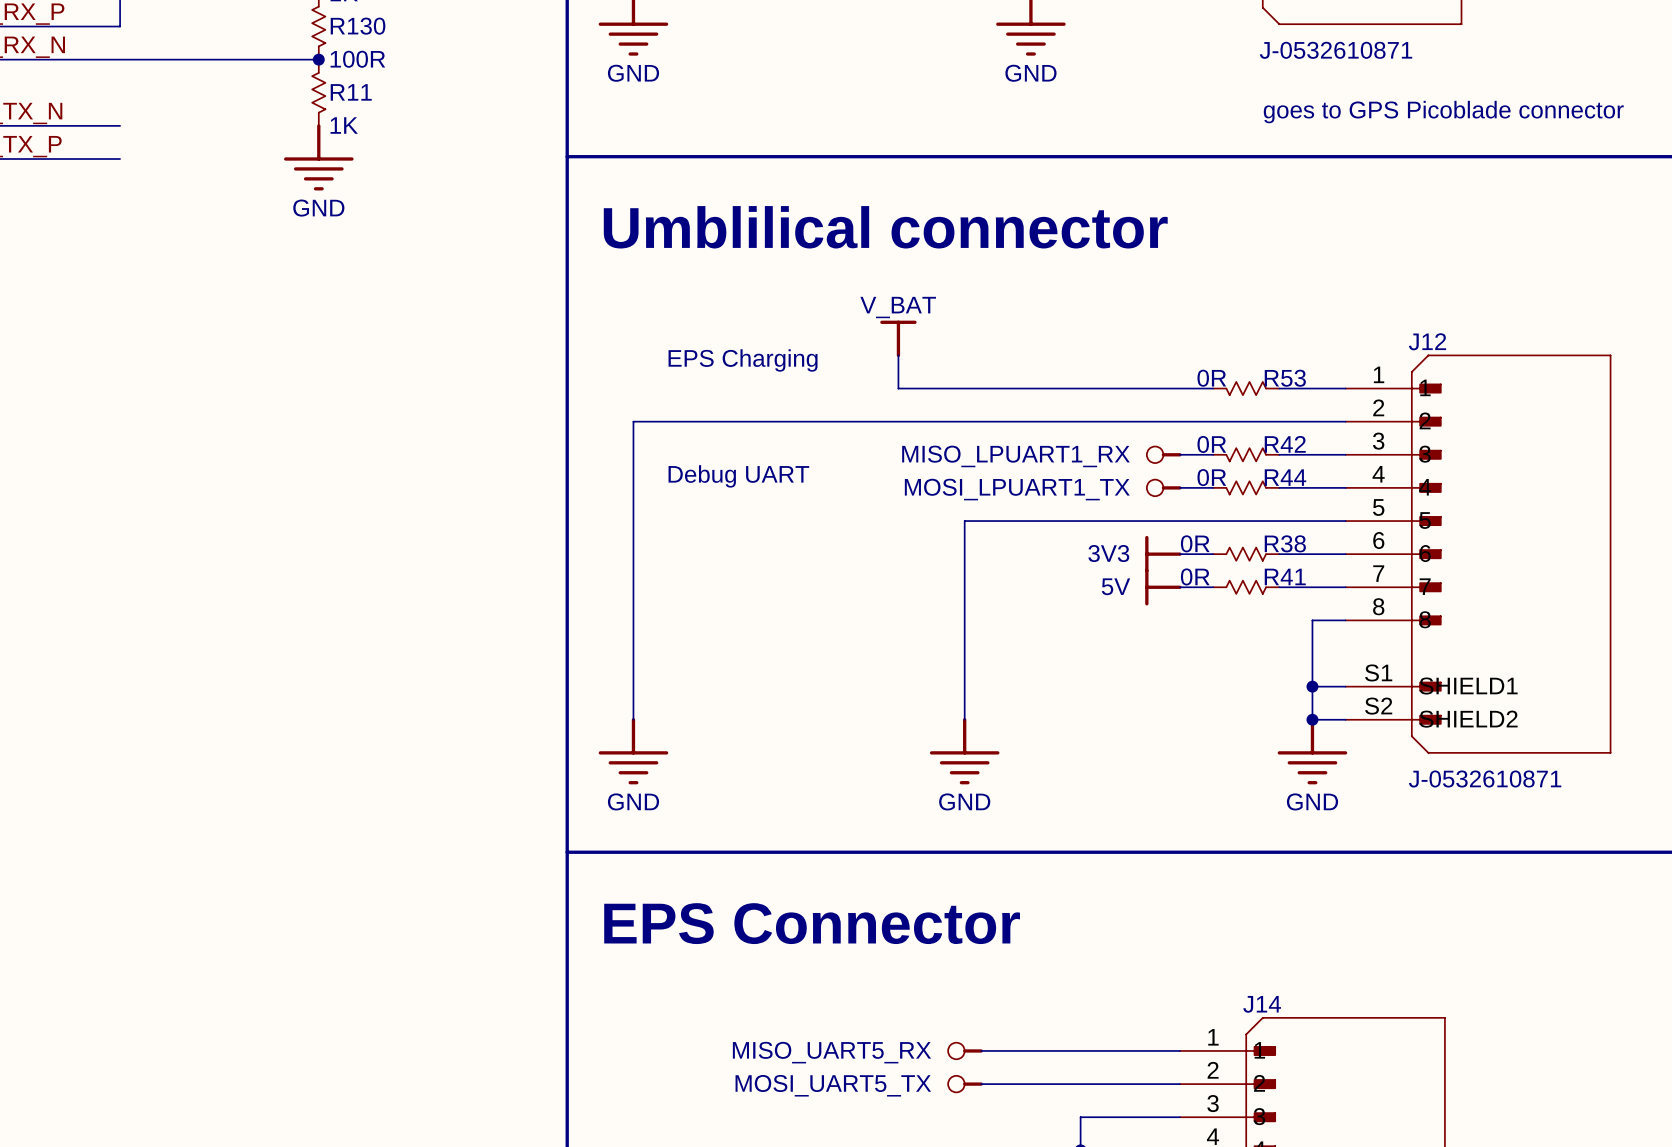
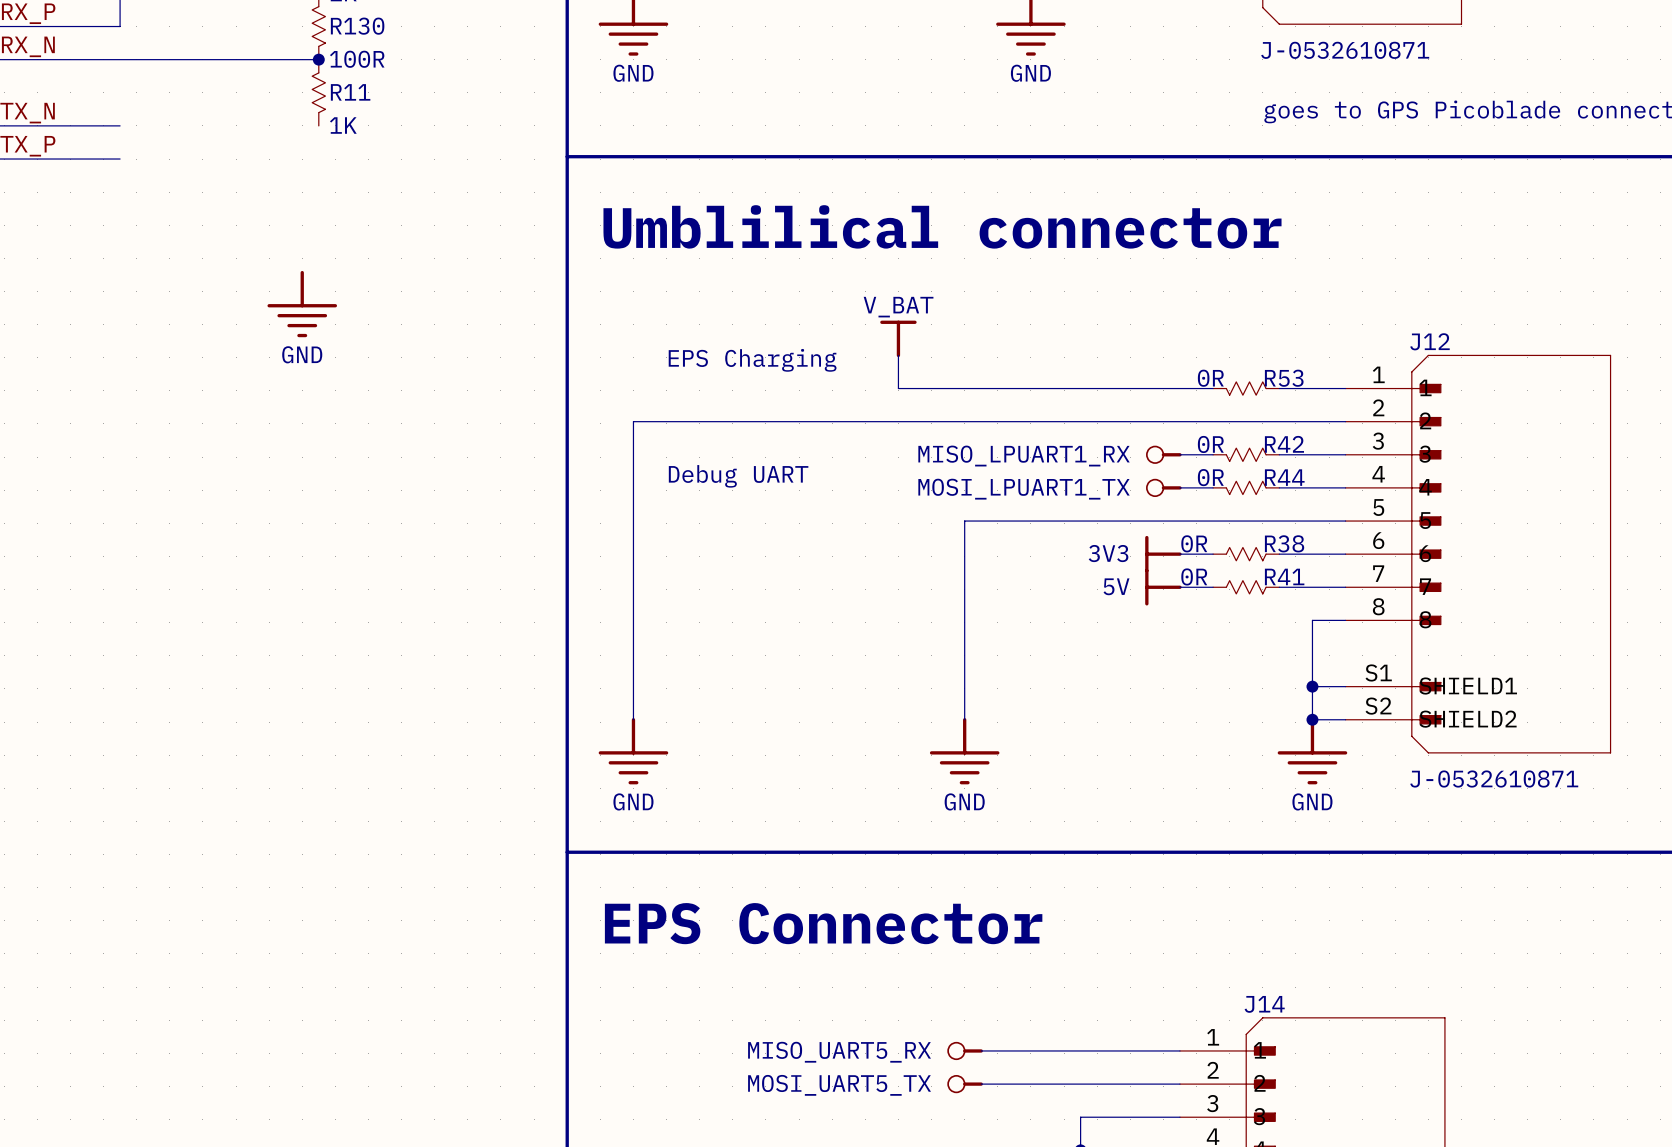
power symbol position: GND (318, 157) -> GND (302, 304)

